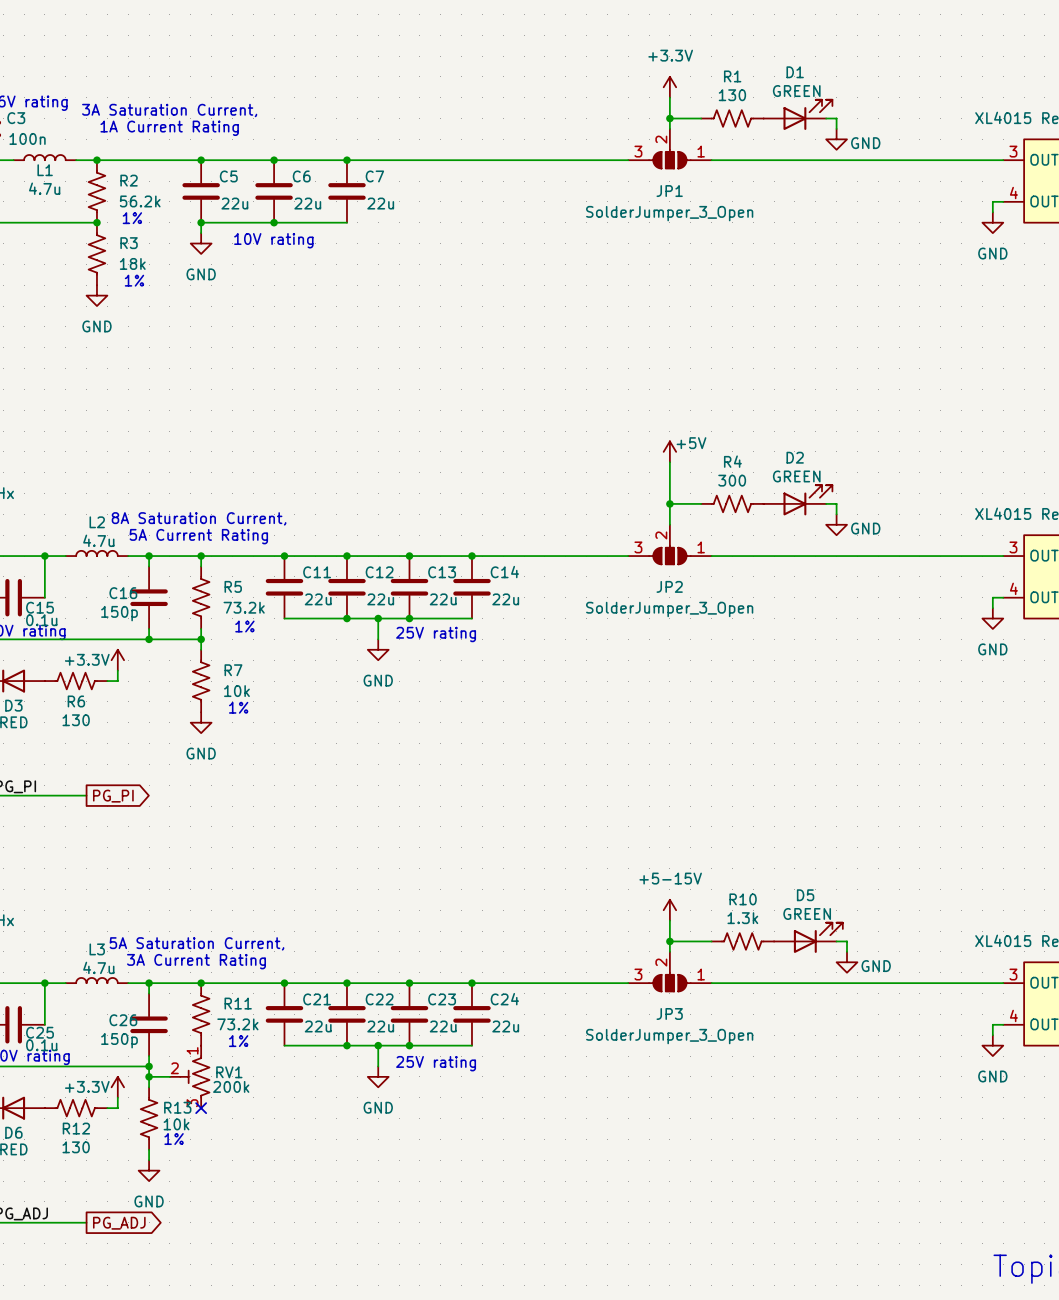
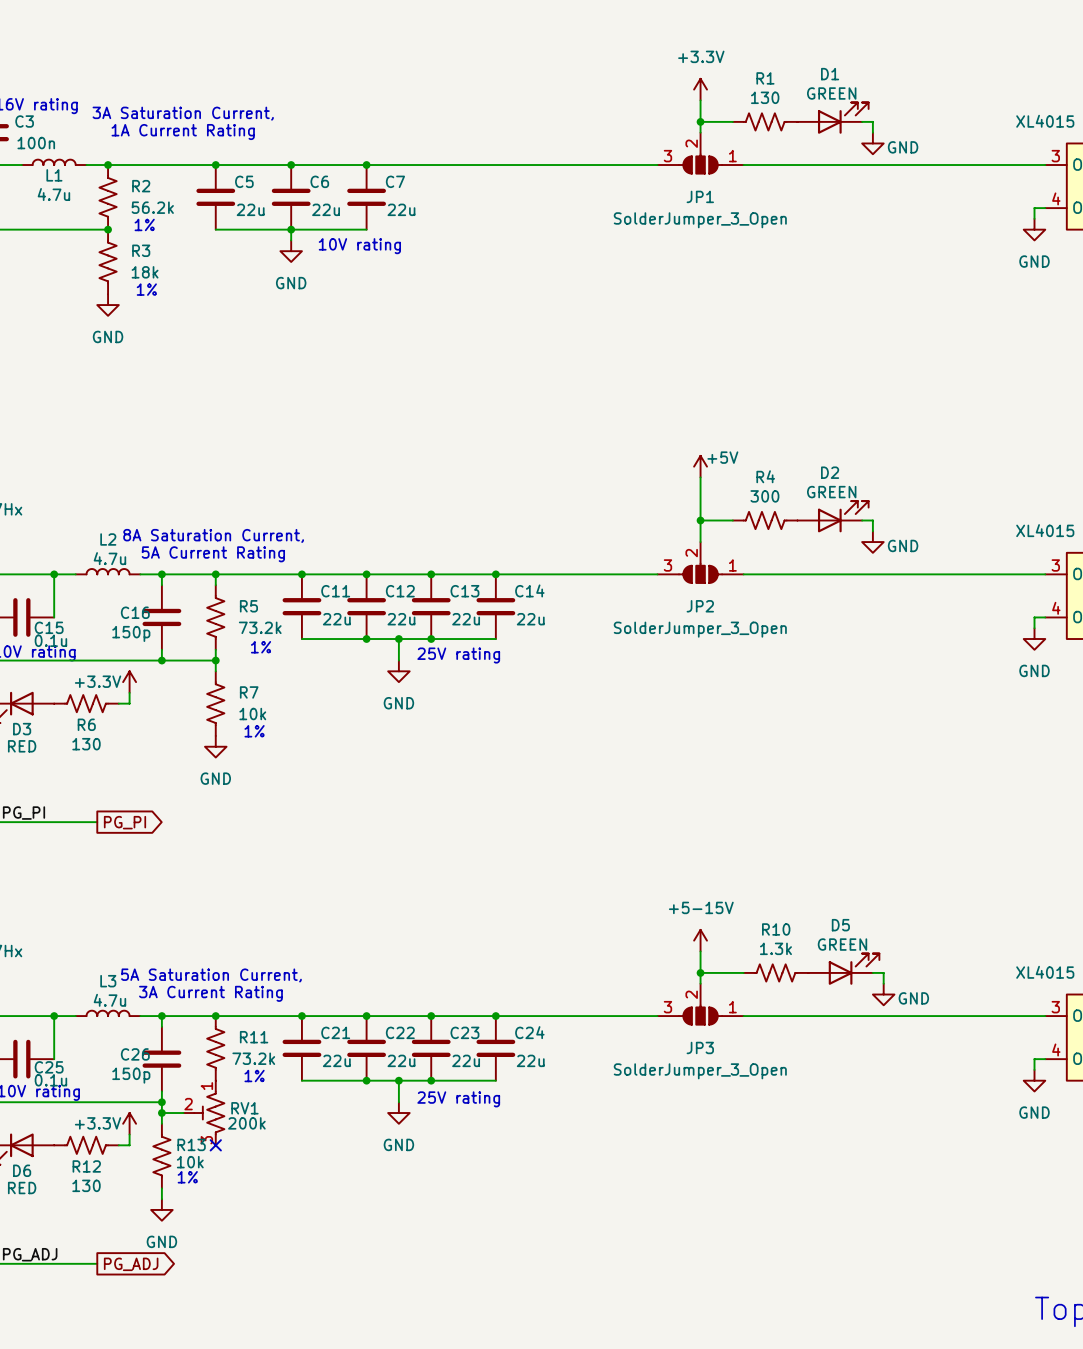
wire: (201, 222) (201, 233) -> (291, 229) (291, 240)
junction: (201, 222) -> none
text position: 10V rating (273, 240) -> 10V rating (359, 246)
power symbol position: GND (201, 243) -> GND (291, 251)

